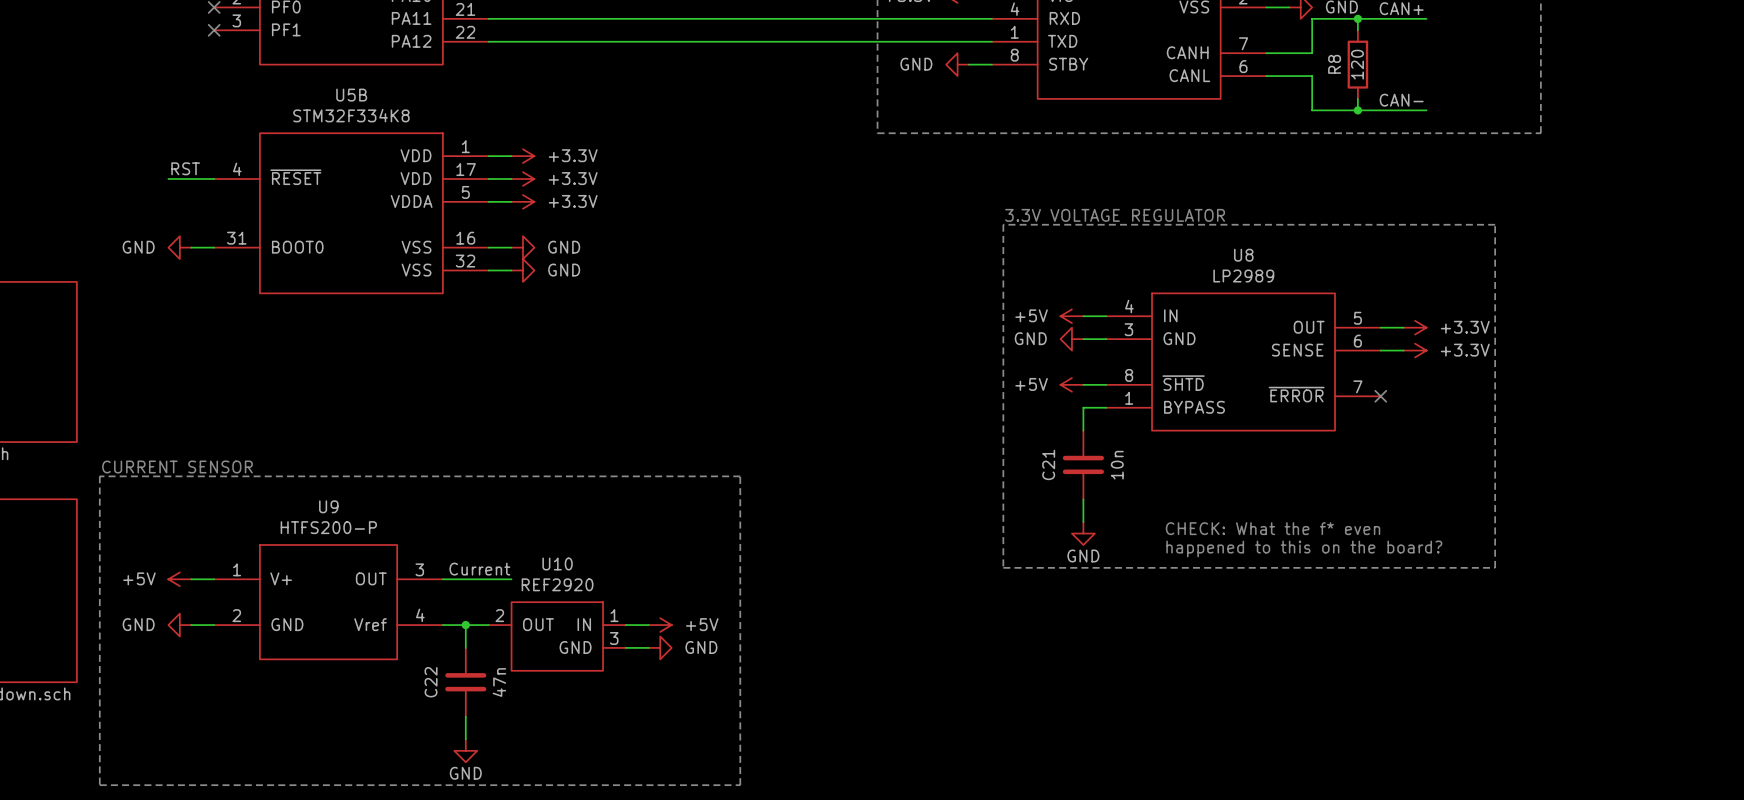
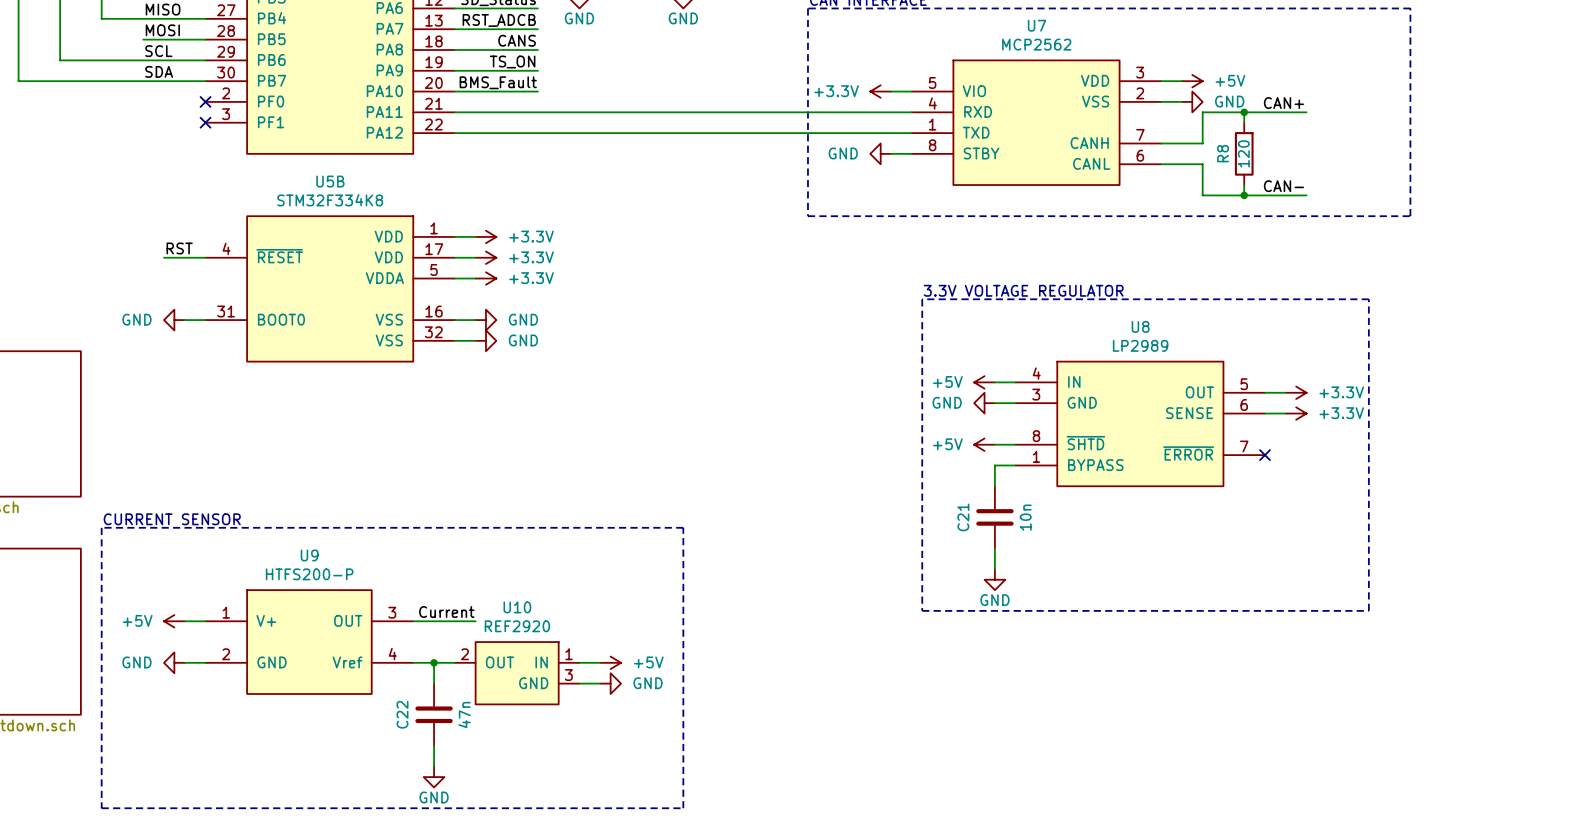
text: CHECK: What the f* even (1273, 528) -> none
text: happened to this on the board? (1304, 548) -> none

